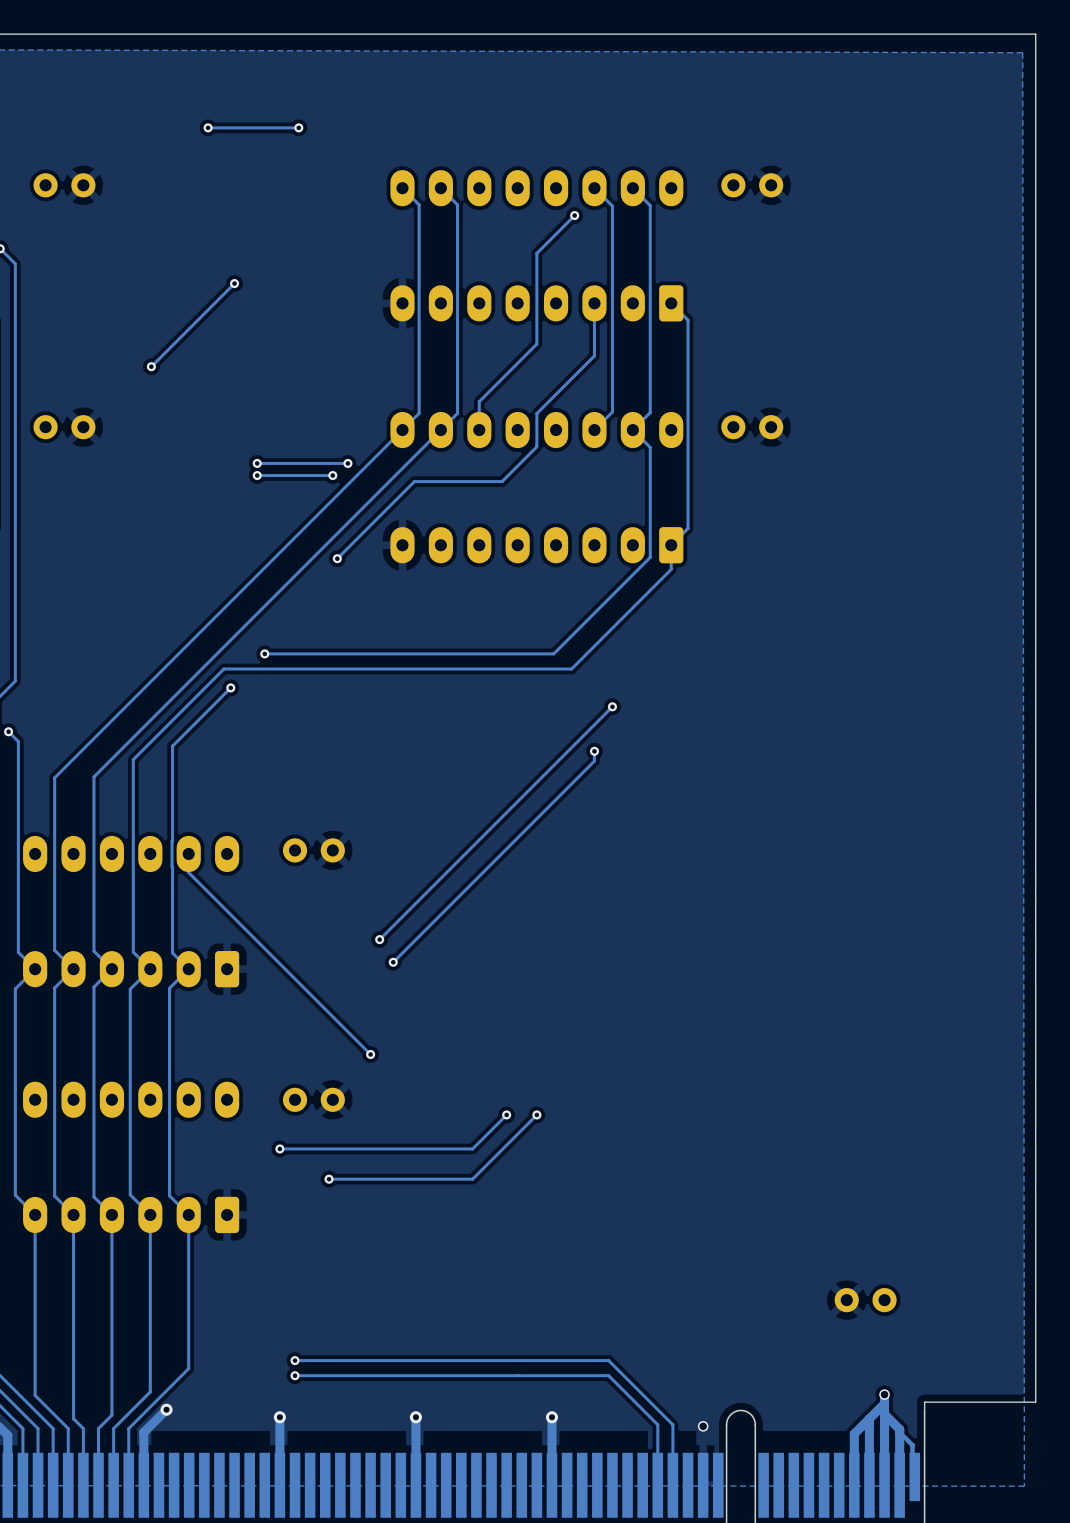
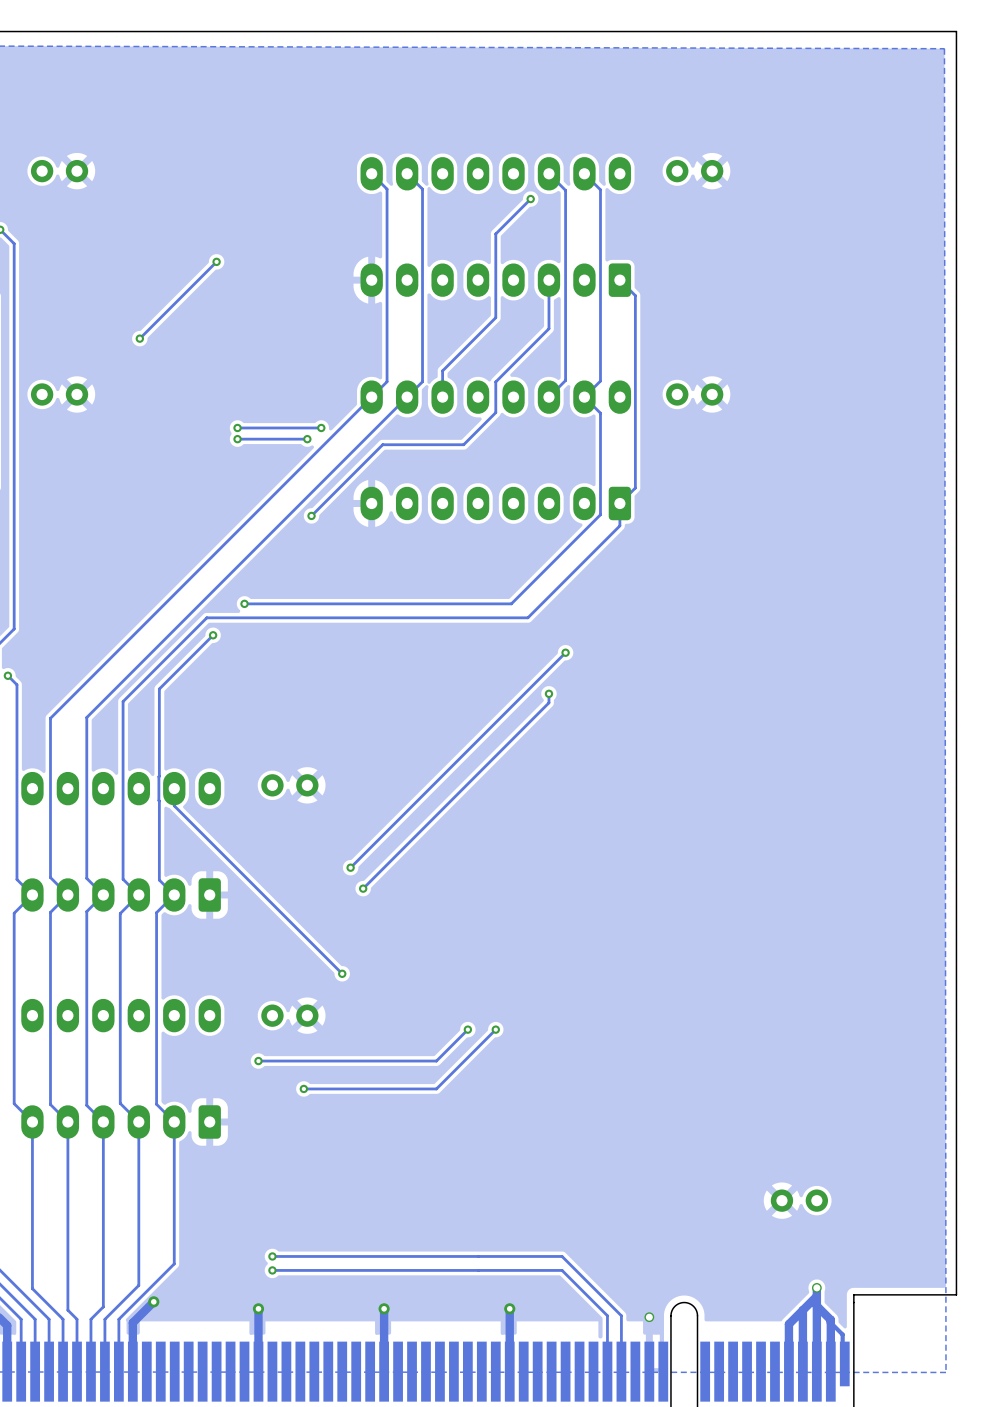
via: (208, 127) -> none
track: (298, 127) (208, 127) -> none
via: (298, 127) -> none

